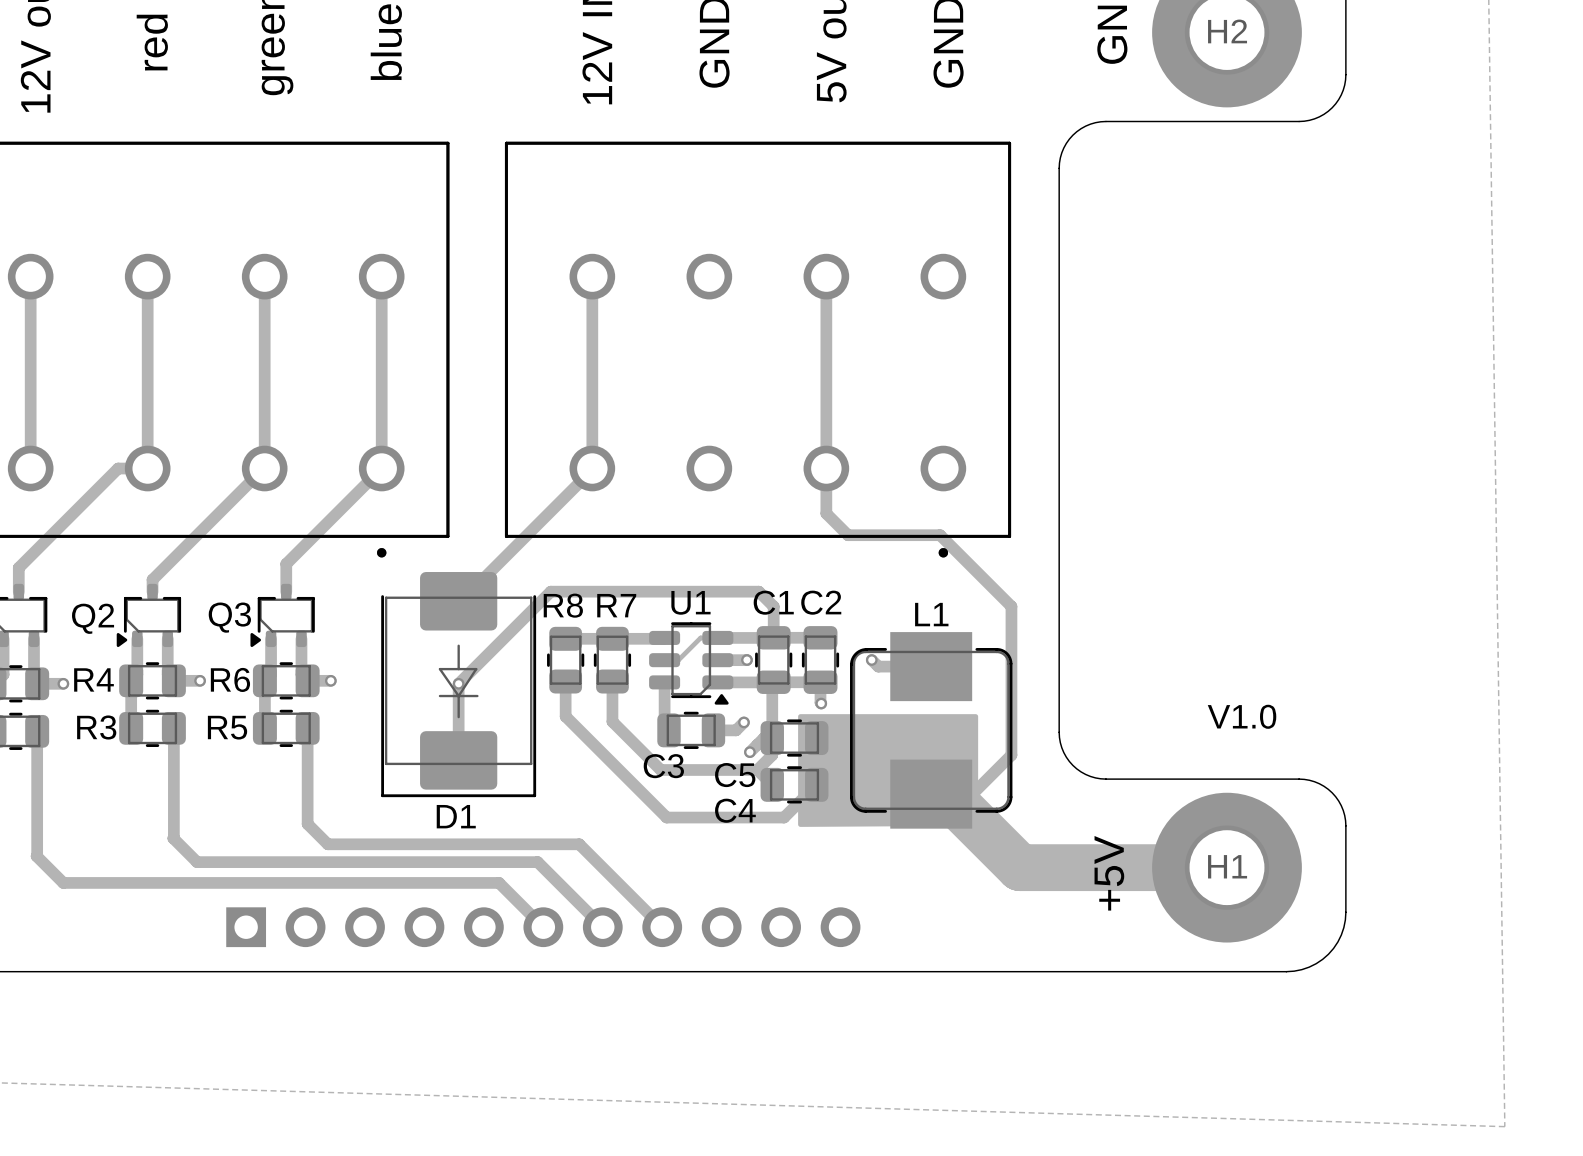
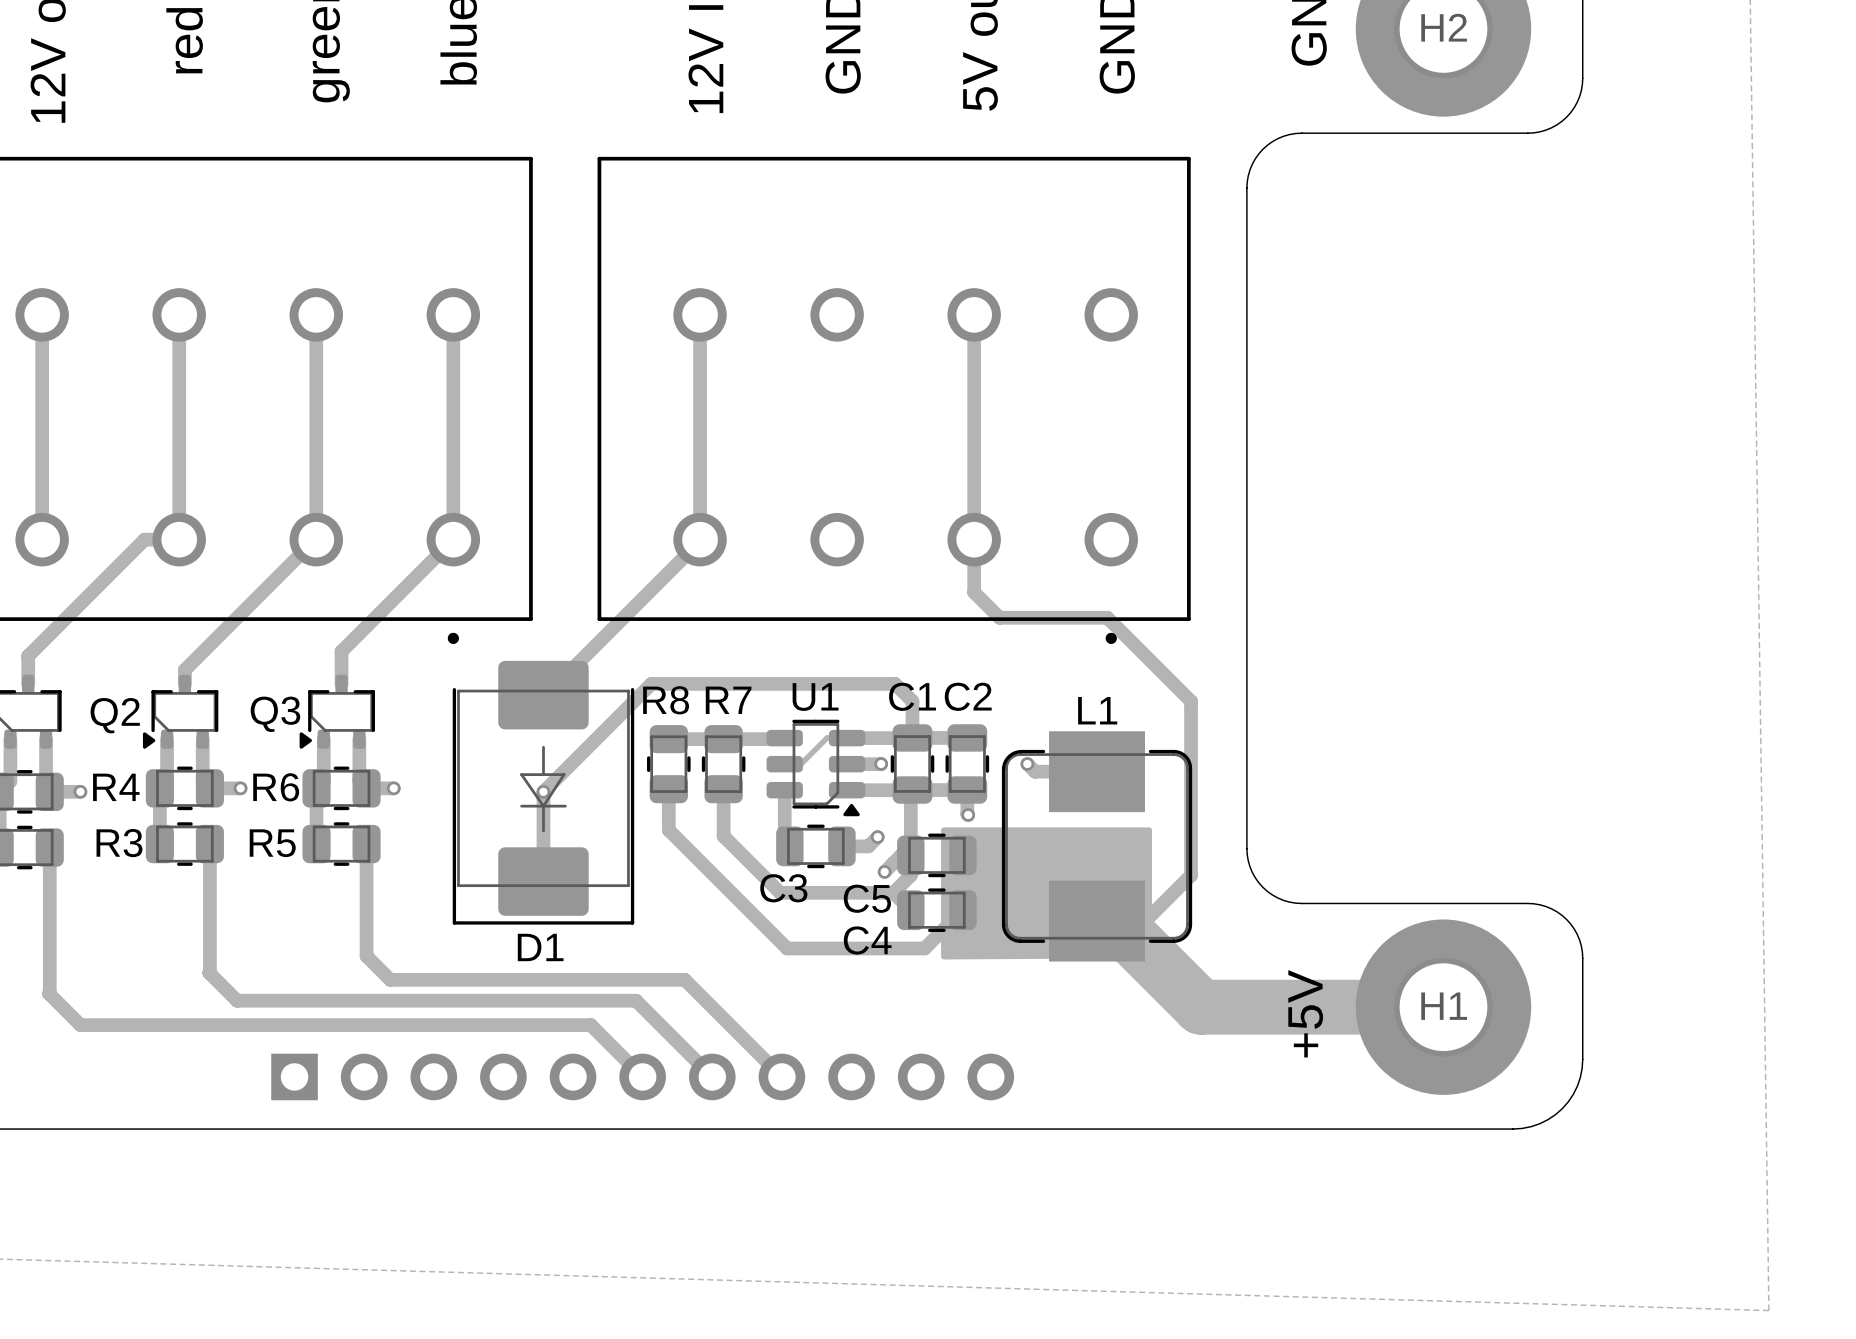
text: V1.0 (1242, 716) -> none

